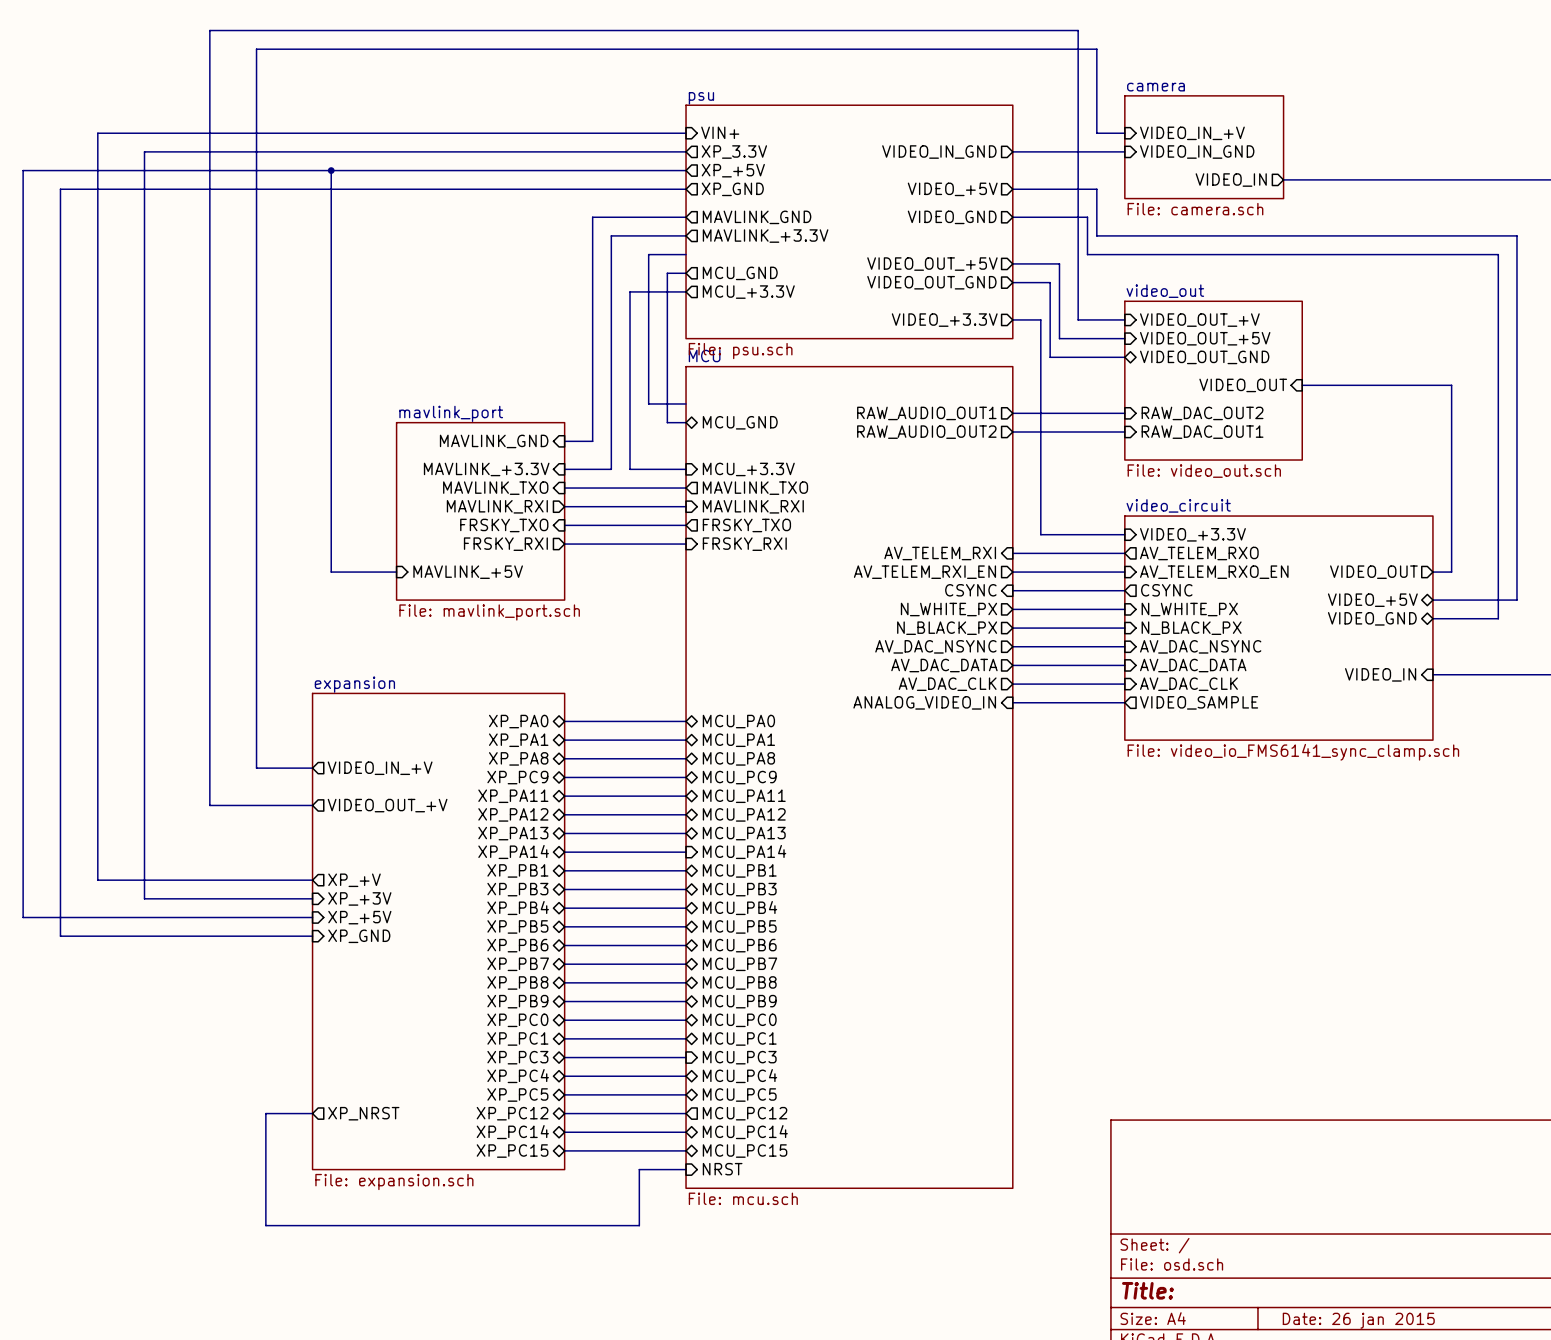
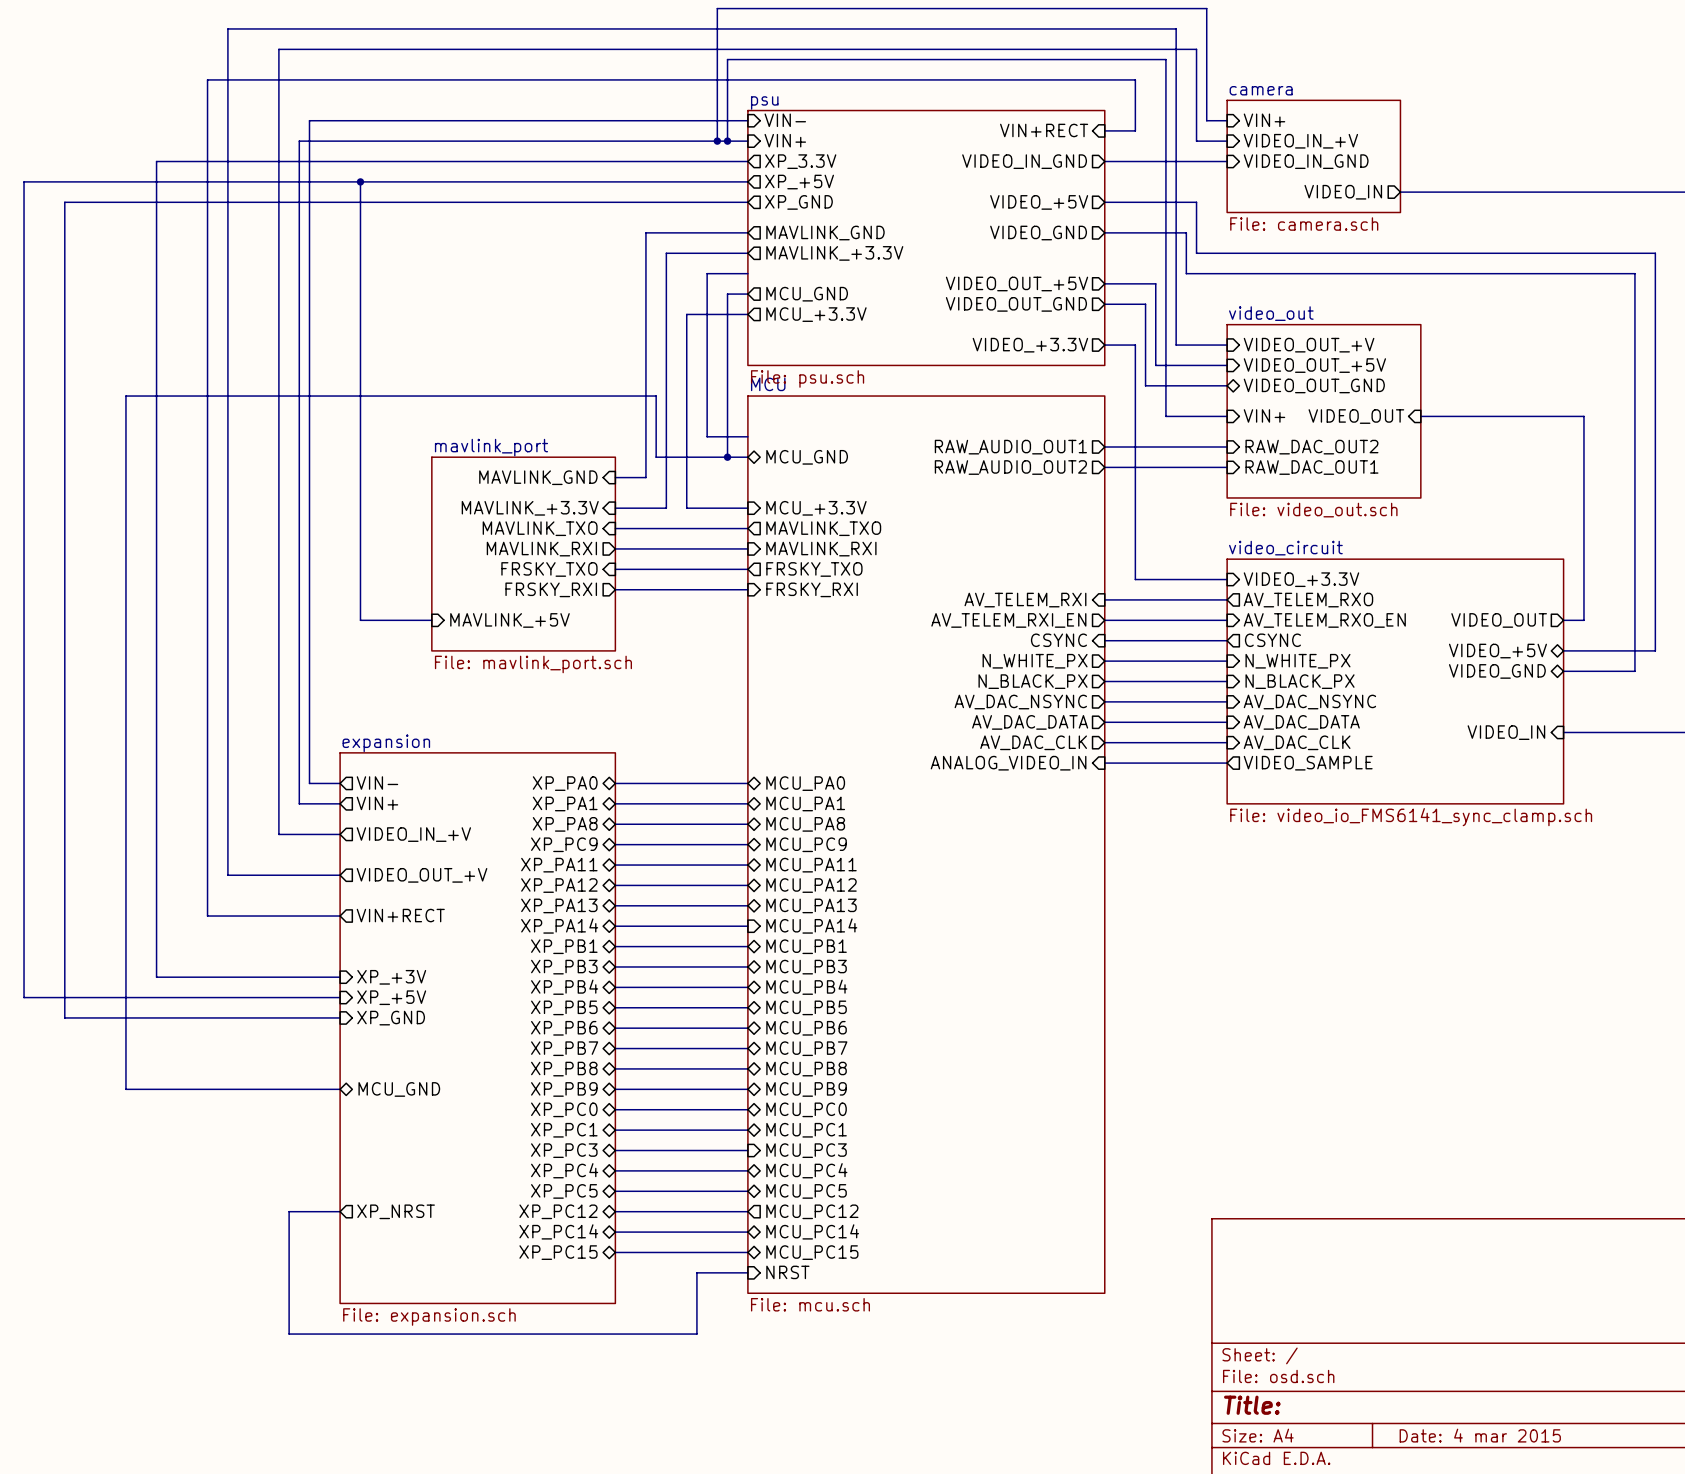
wire: none -> (747, 120) (309, 120) (309, 783) (340, 783)
sheet pin: none -> VIN- (785, 120)
wire: none -> (1227, 120) (1206, 120) (1206, 8) (717, 8) (717, 141)
sheet pin: none -> VIN+ (1264, 120)
sheet pin: none -> VIN+RECT (1044, 130)
wire: none -> (1104, 130) (1135, 130) (1135, 79) (207, 79) (207, 916) (340, 916)
wire: (275, 133) (97, 133) (97, 880) (312, 880) -> (299, 141) (299, 803) (340, 803)
junction: none -> (717, 141)
wire: none -> (727, 141) (727, 59) (1165, 59) (1165, 416) (1227, 416)
junction: none -> (727, 141)
sheet pin: none -> VIN+ (1264, 415)
wire: none -> (727, 457) (656, 457) (656, 396) (125, 396) (125, 1089) (340, 1089)
junction: none -> (727, 457)
sheet pin: none -> VIN- (377, 783)
sheet pin: none -> VIN+ (377, 803)
sheet pin: none -> VIN+RECT (400, 915)
sheet pin: XP_+V (354, 880) -> none
sheet expansion: File: expansion.sch (438, 931) -> none
sheet expansion: none -> File: expansion.sch (477, 1028)
sheet pin: none -> MCU_GND (399, 1089)
title block: Date: 26 jan 2015 (1358, 1320) -> Date: 4 mar 2015 (1480, 1435)

